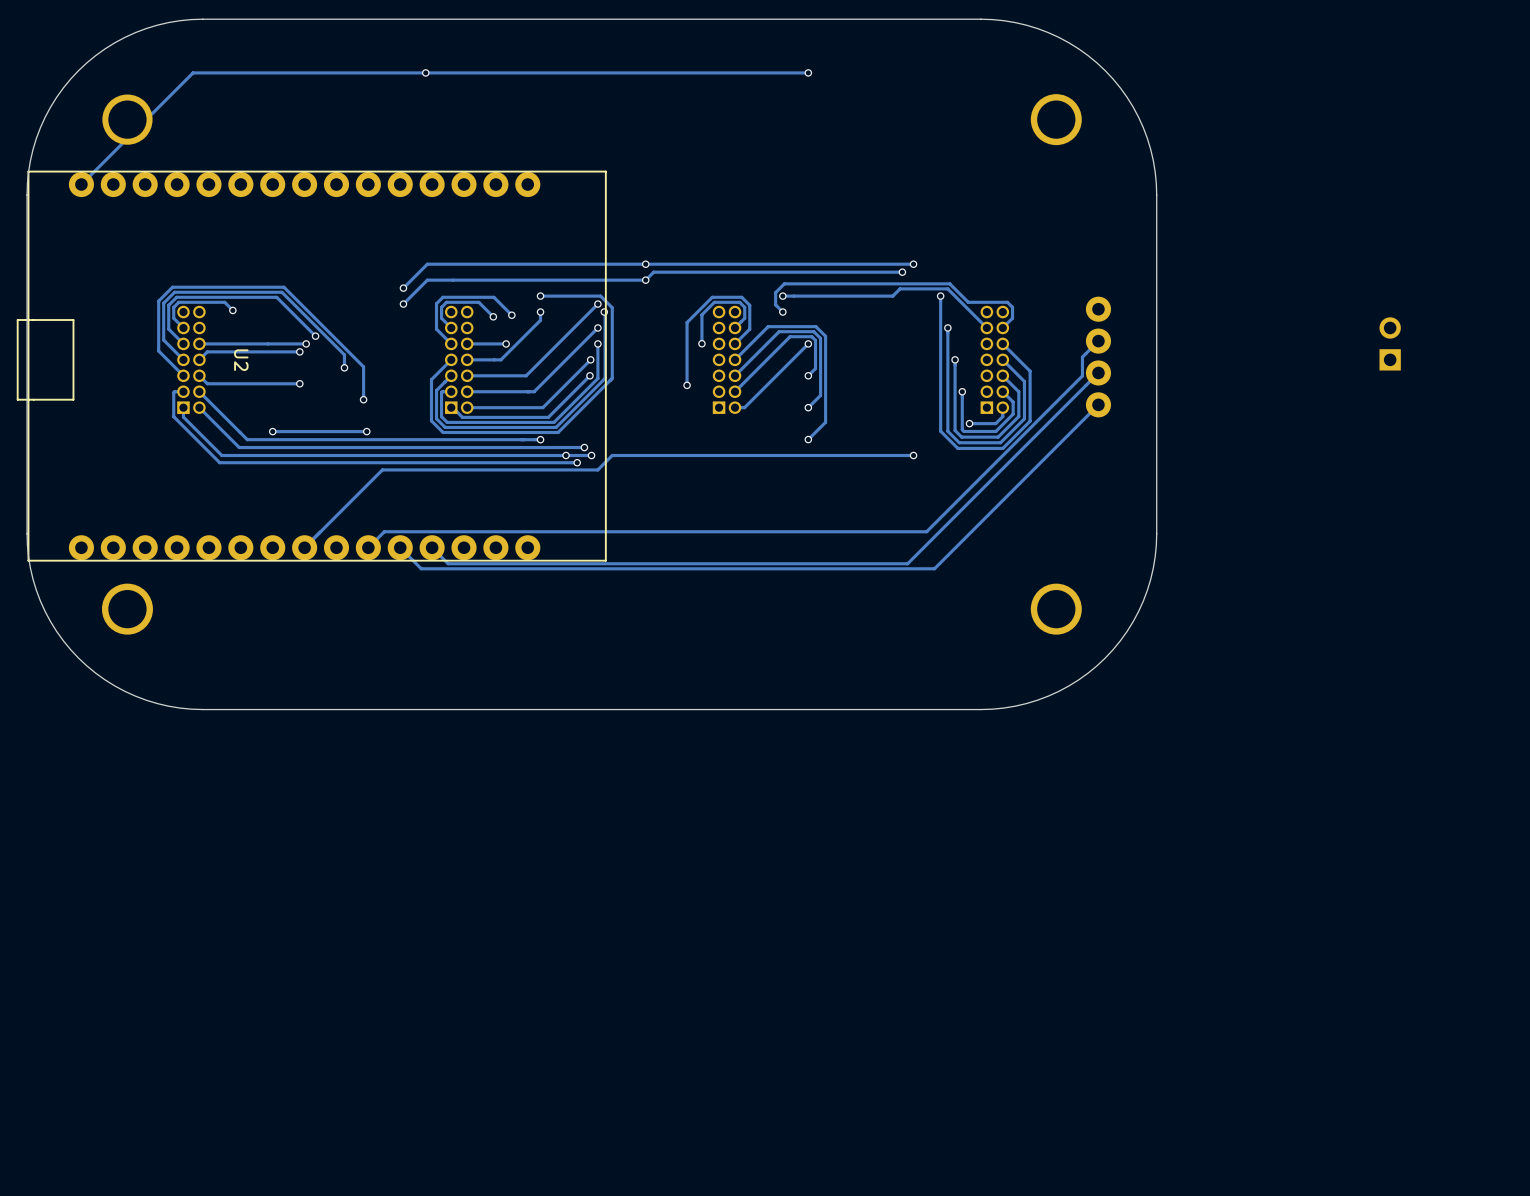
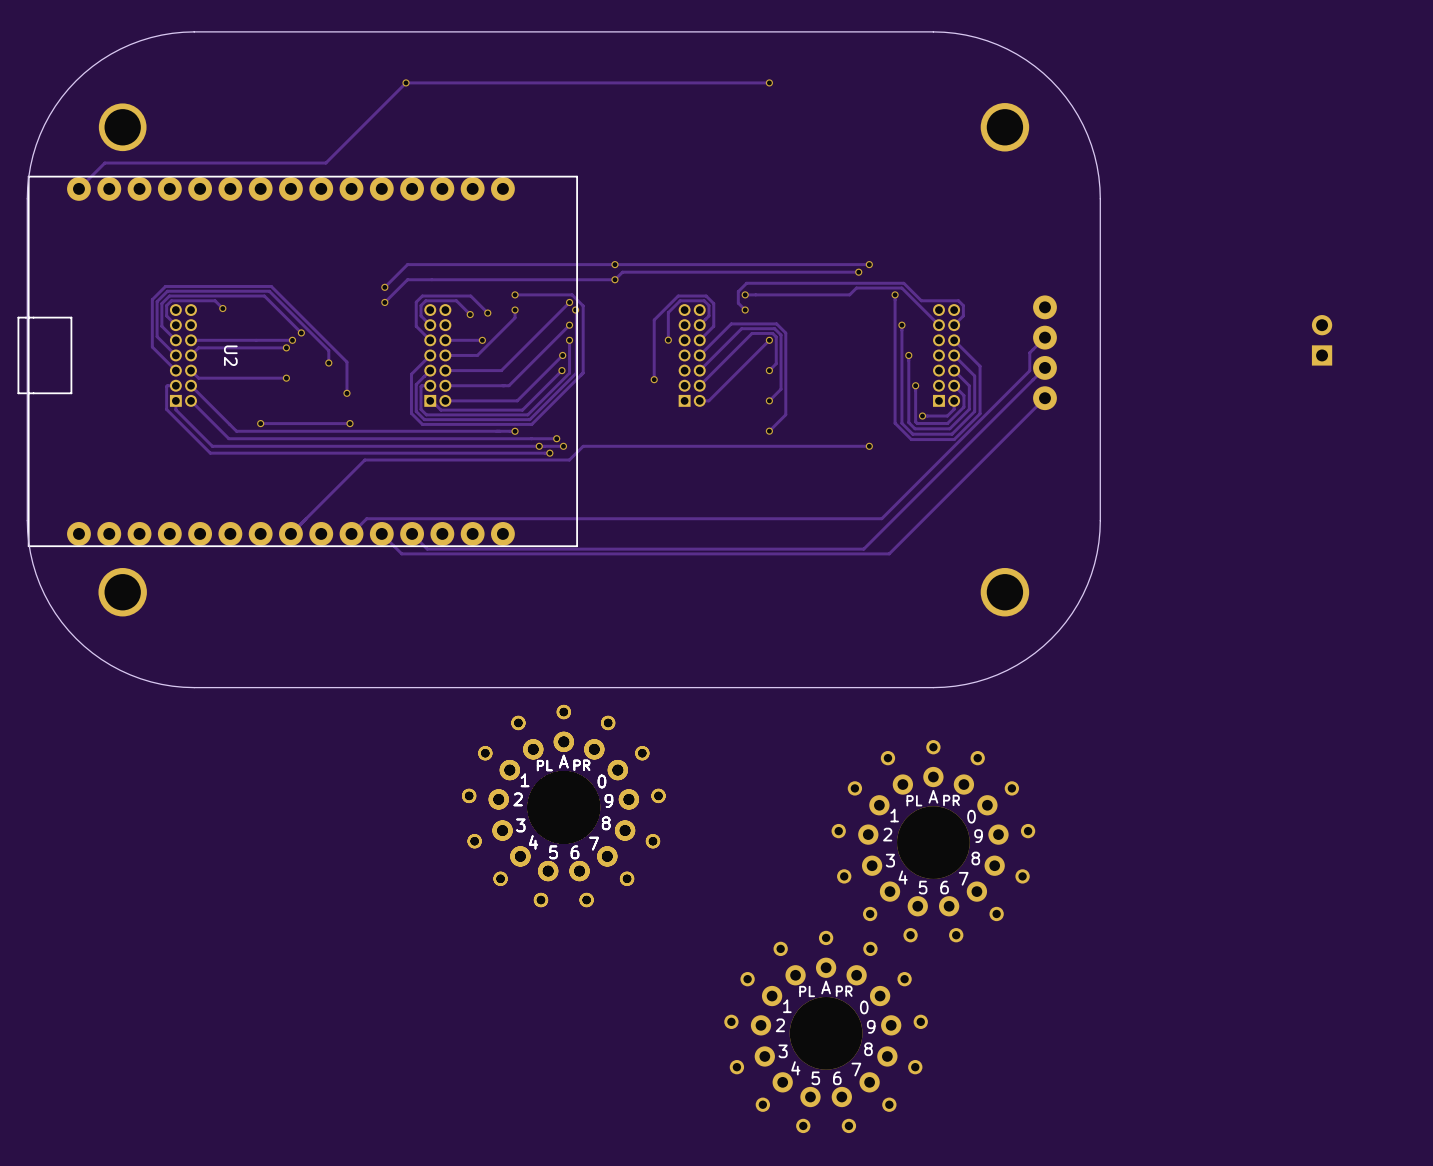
track: (425, 72) (193, 72) (108, 157) -> (406, 82) (325, 163) (104, 163)
part: none -> (563, 806)
part: none -> (933, 841)
part: none -> (826, 1031)

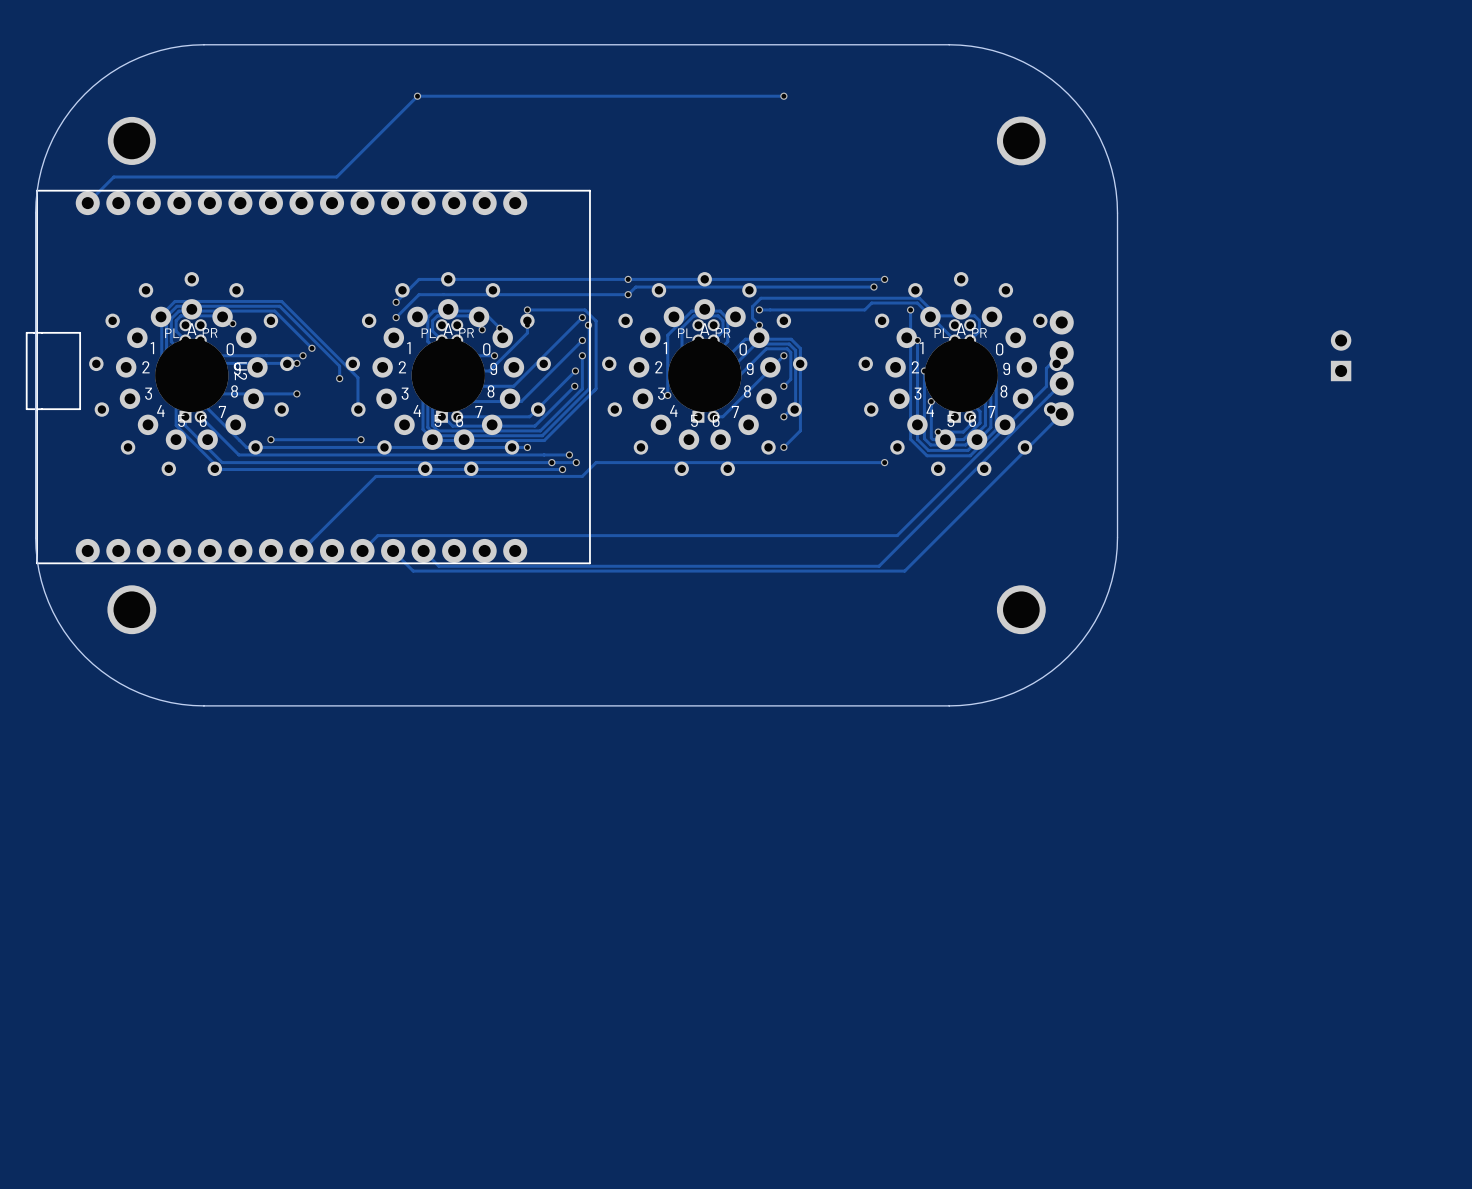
part: none -> (191, 374)
part: none -> (448, 374)
part: none -> (704, 374)
part: none -> (961, 374)
part: (563, 806) -> none
part: (933, 841) -> none
part: (826, 1031) -> none

